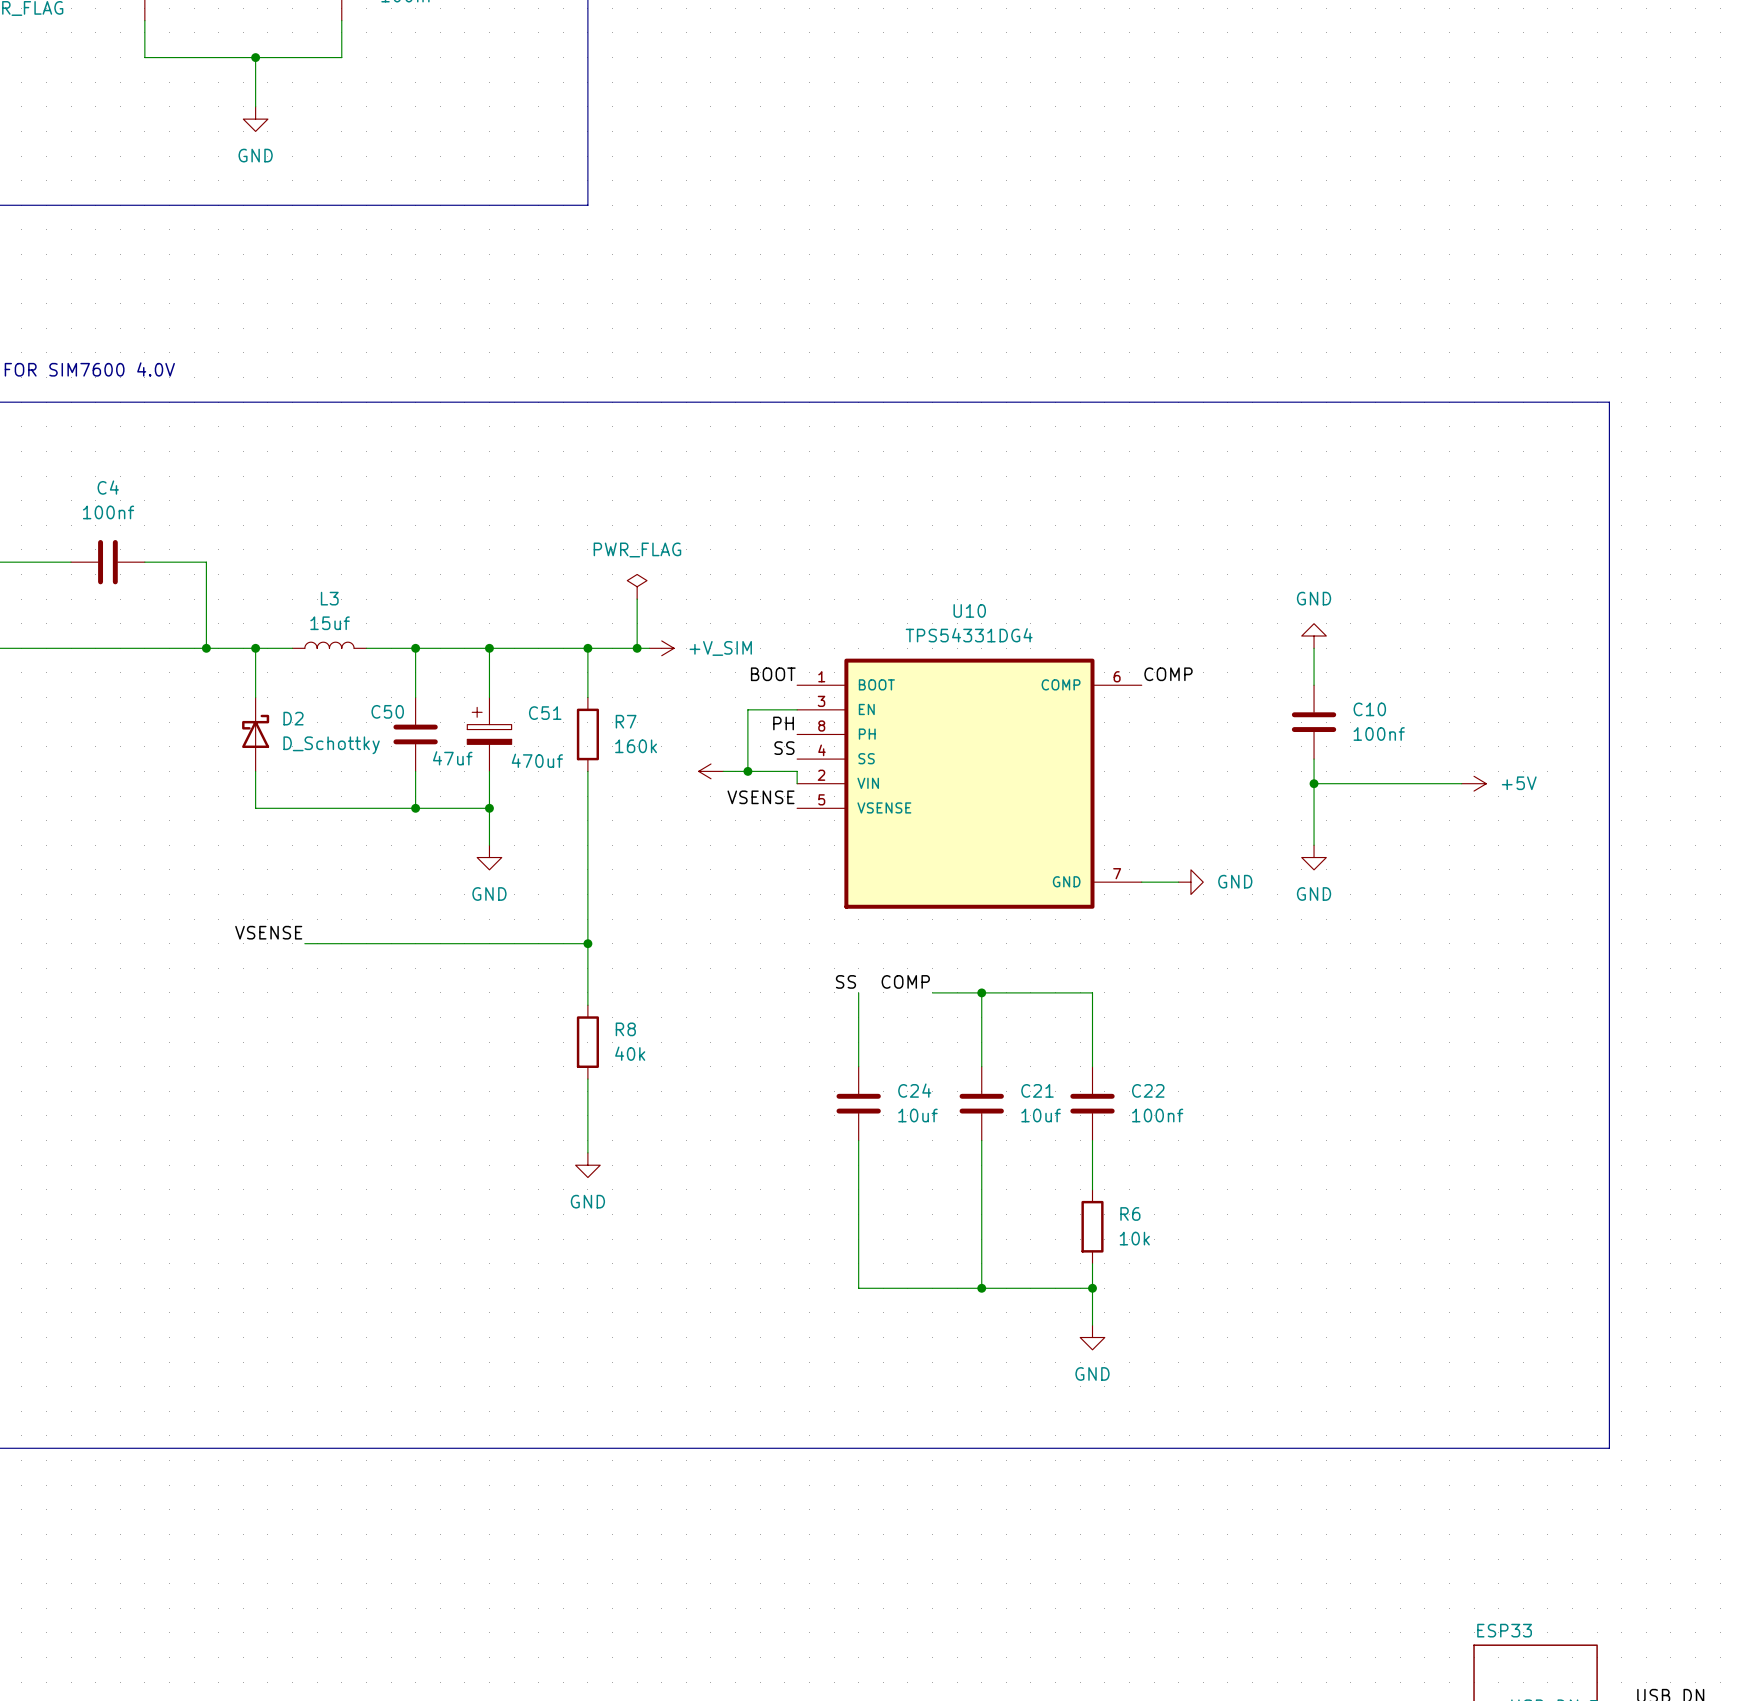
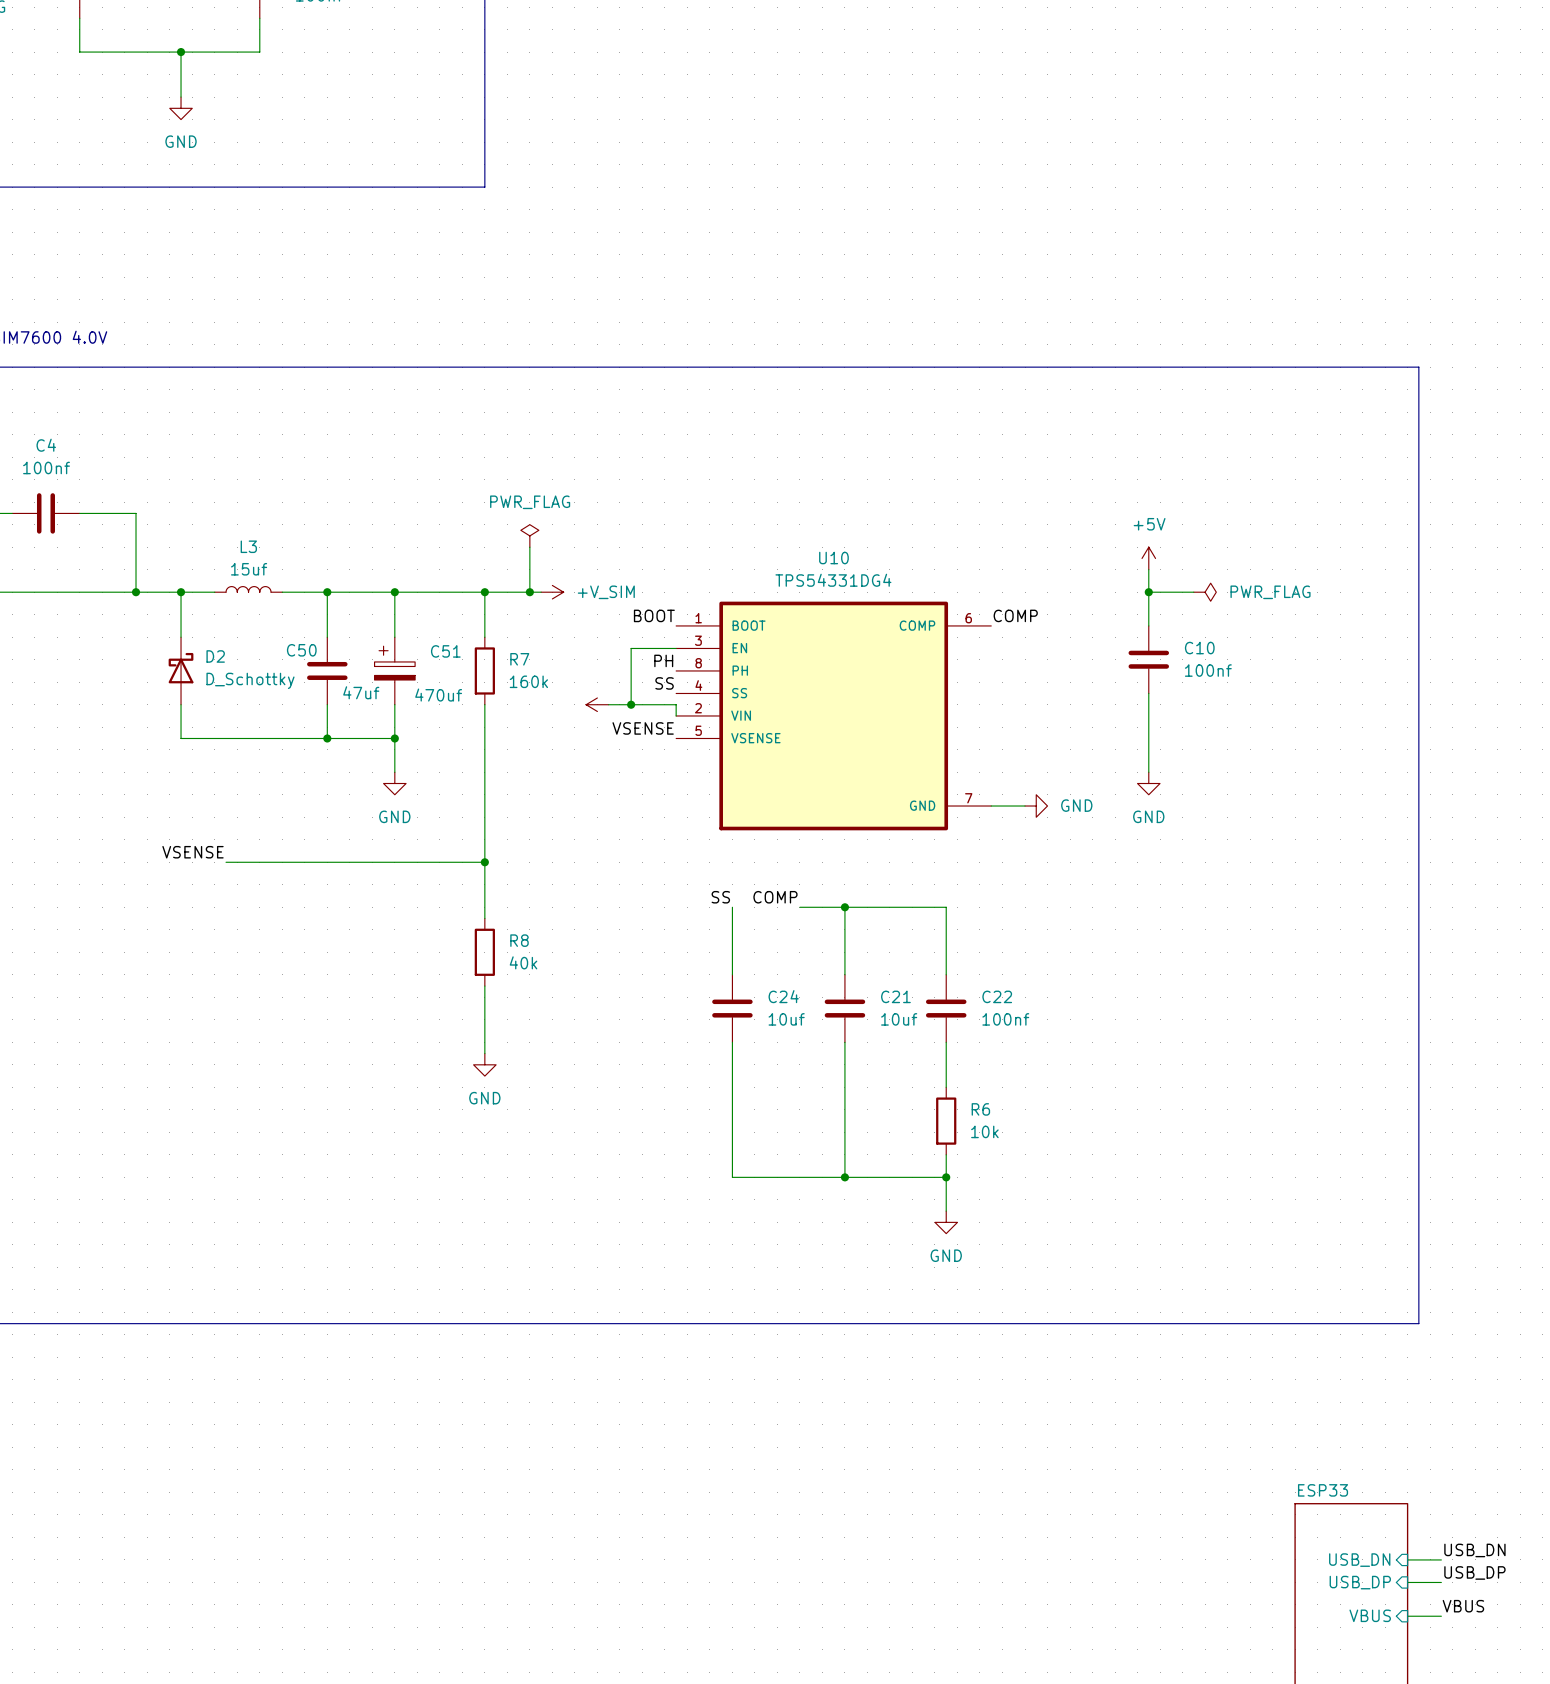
wire: none -> (1148, 569) (1148, 592) (1193, 592)
power symbol: GND (1314, 636) -> none
junction: none -> (1148, 592)
power symbol: none -> PWR_FLAG (1205, 592)
wire: (1314, 783) (1461, 783) -> none
junction: (1314, 783) -> none
power symbol rotation: 0° (1474, 783) -> 90° counterclockwise (1148, 558)
power symbol position: +5V (1474, 783) -> +5V (1148, 558)

